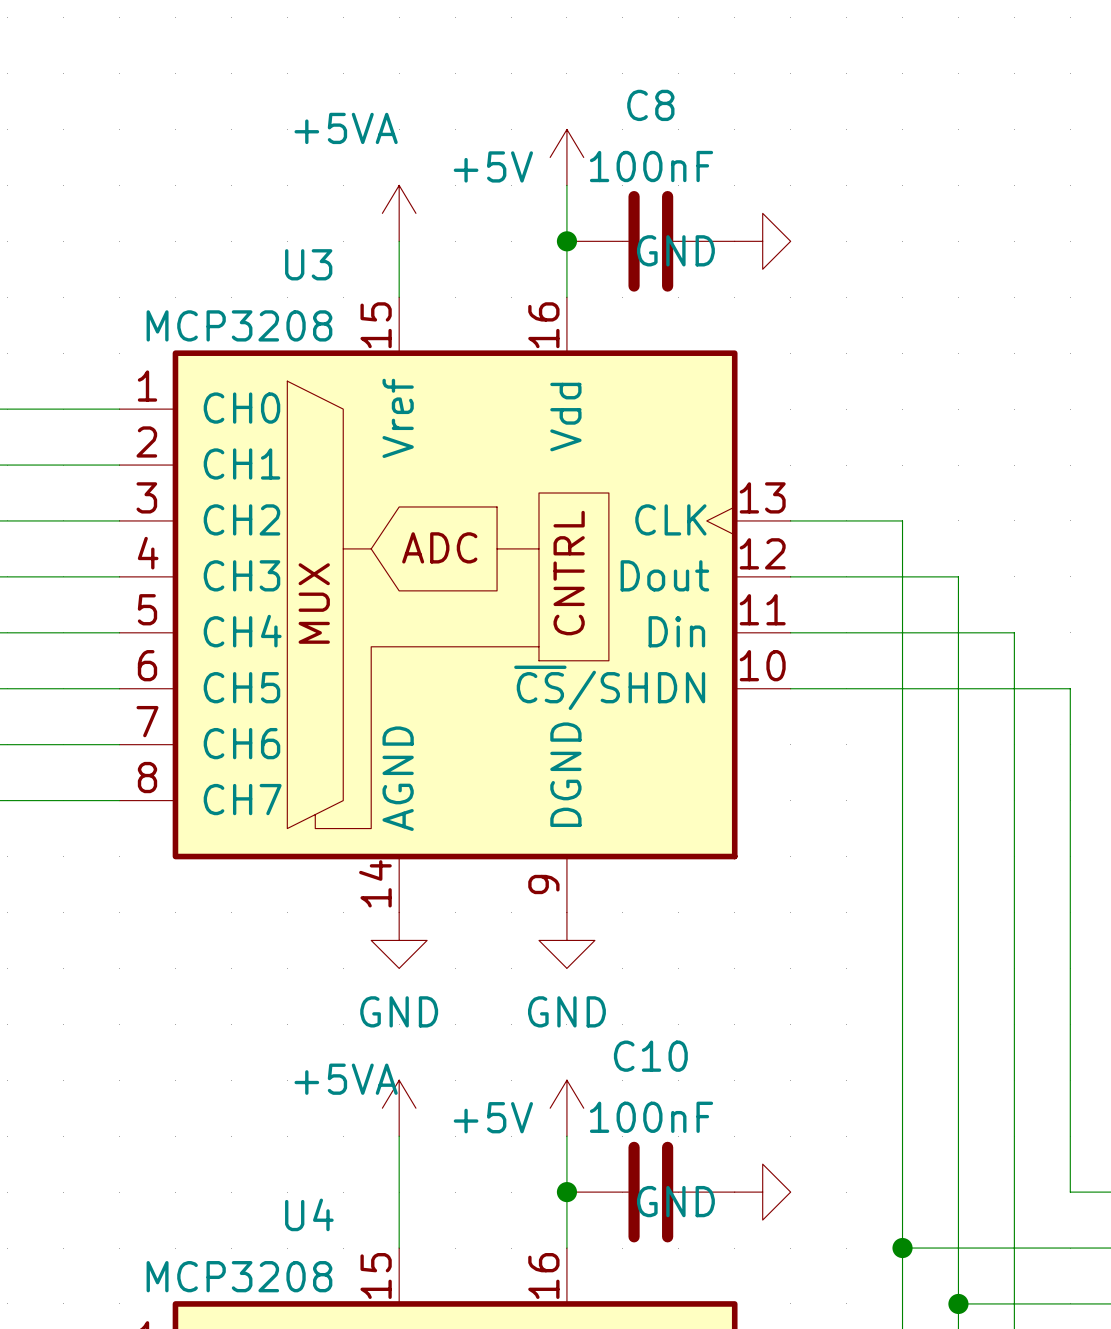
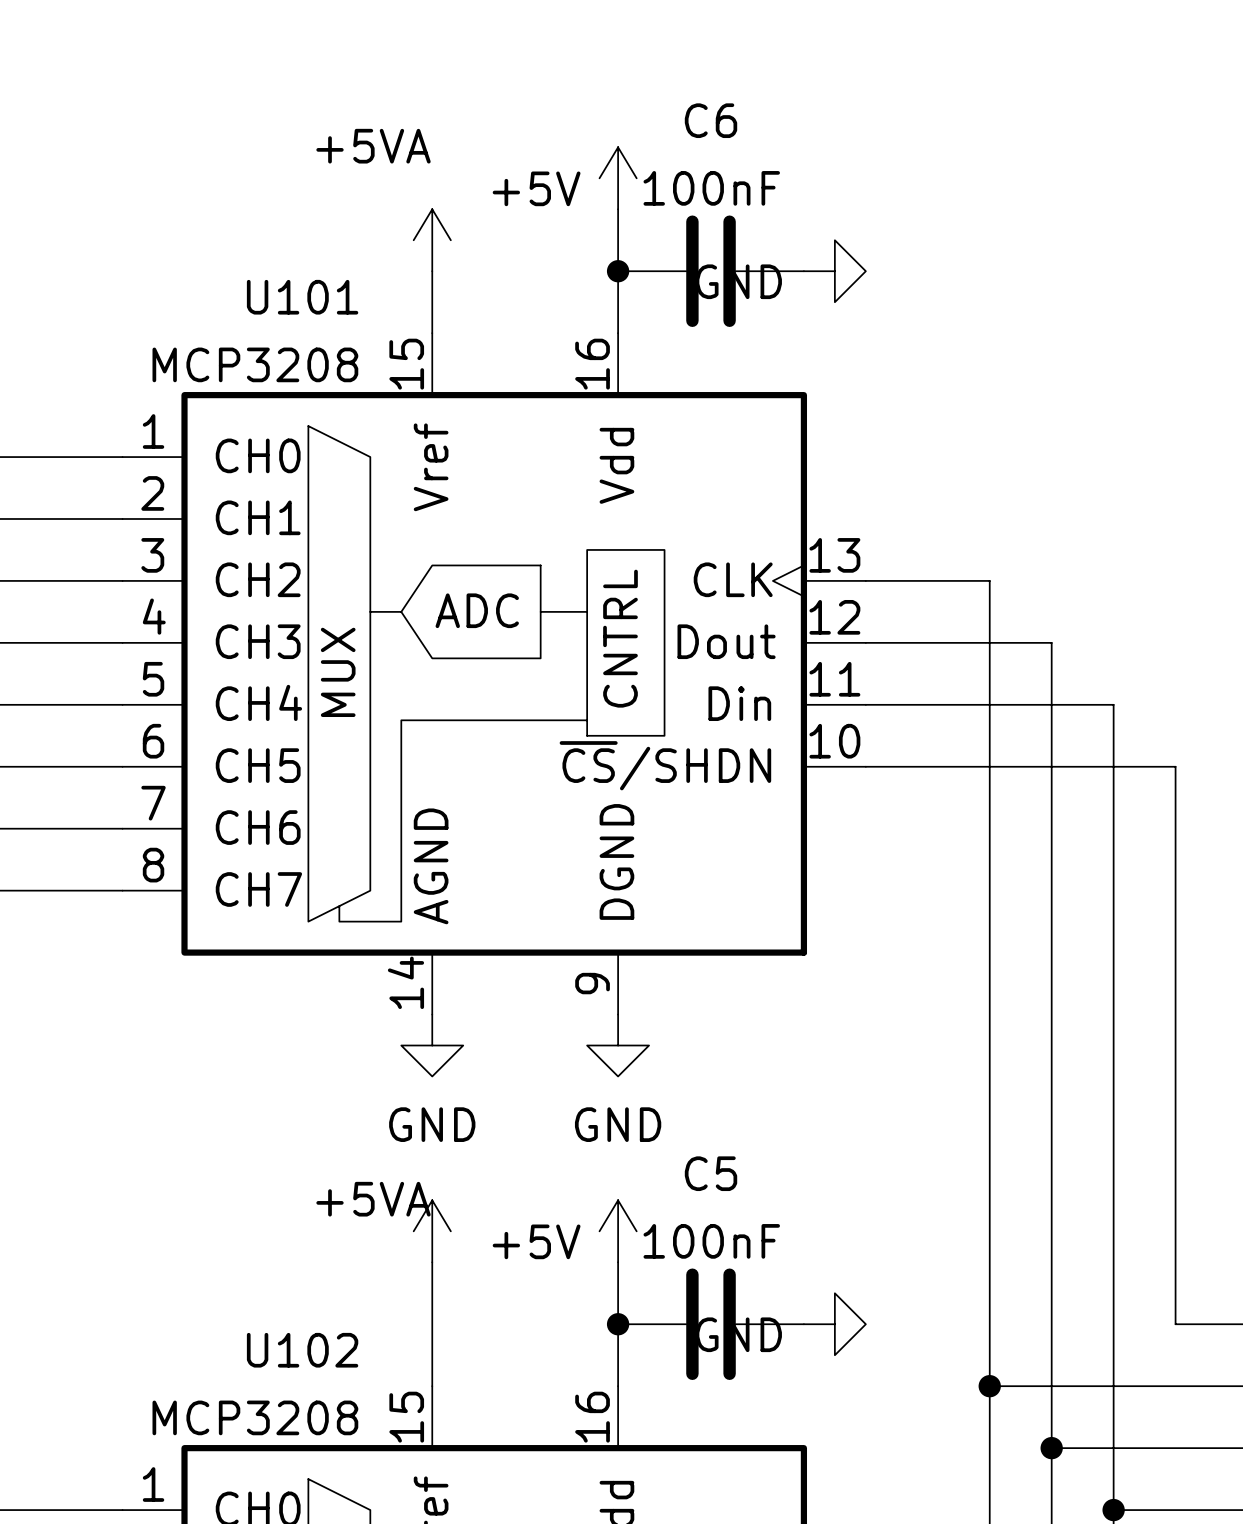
C8 name: C8 (650, 105) -> C6 (711, 120)
U3 name: U3 (308, 264) -> U101 (302, 297)
C10 name: C10 (650, 1056) -> C5 (711, 1173)
U4 name: U4 (309, 1214) -> U102 (302, 1350)

